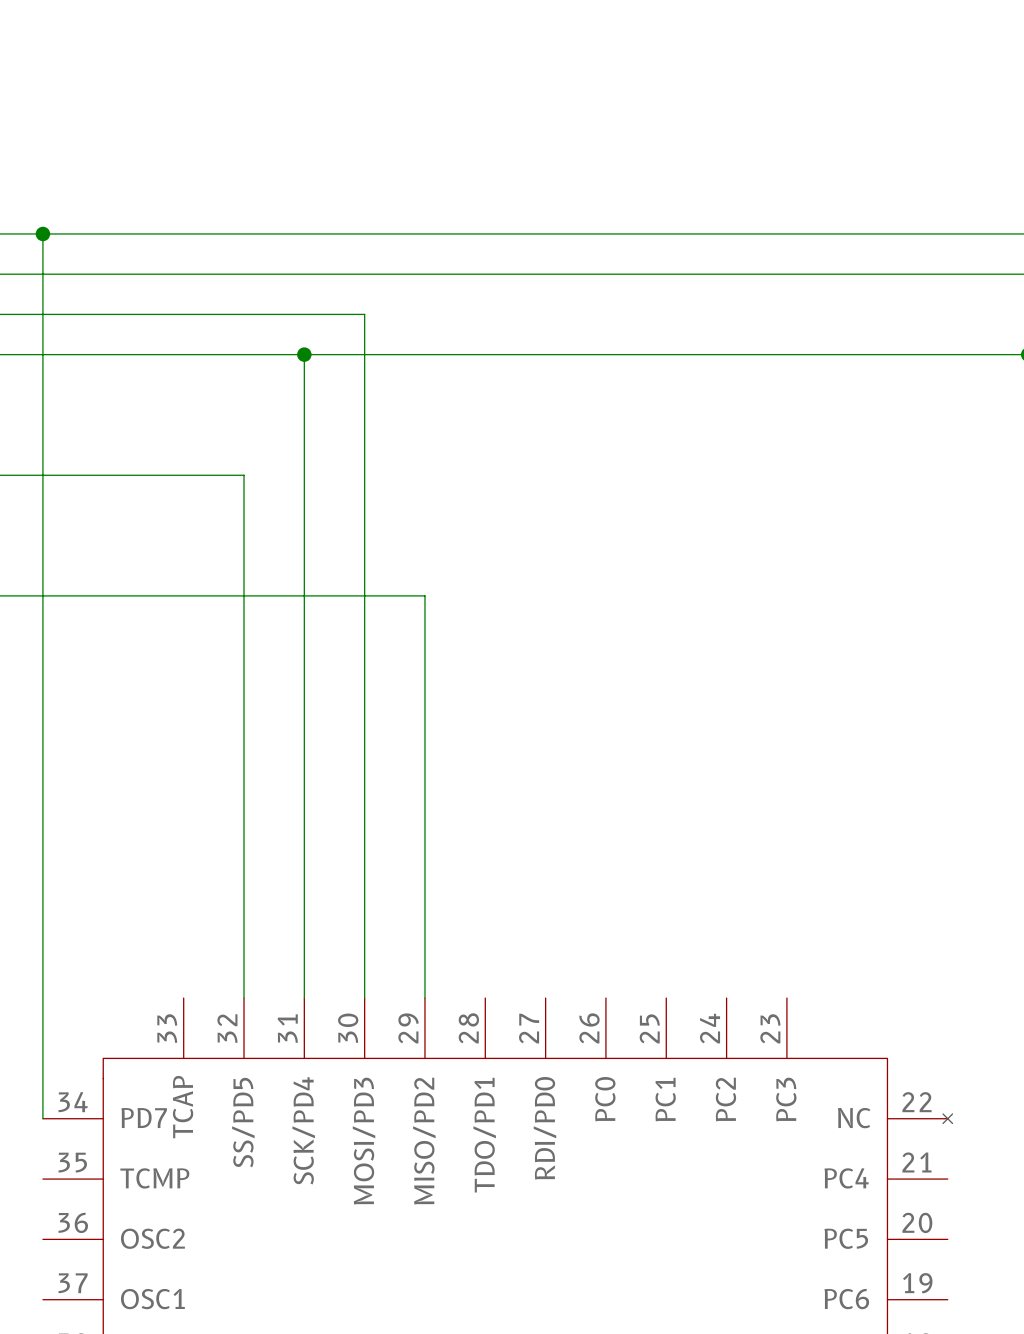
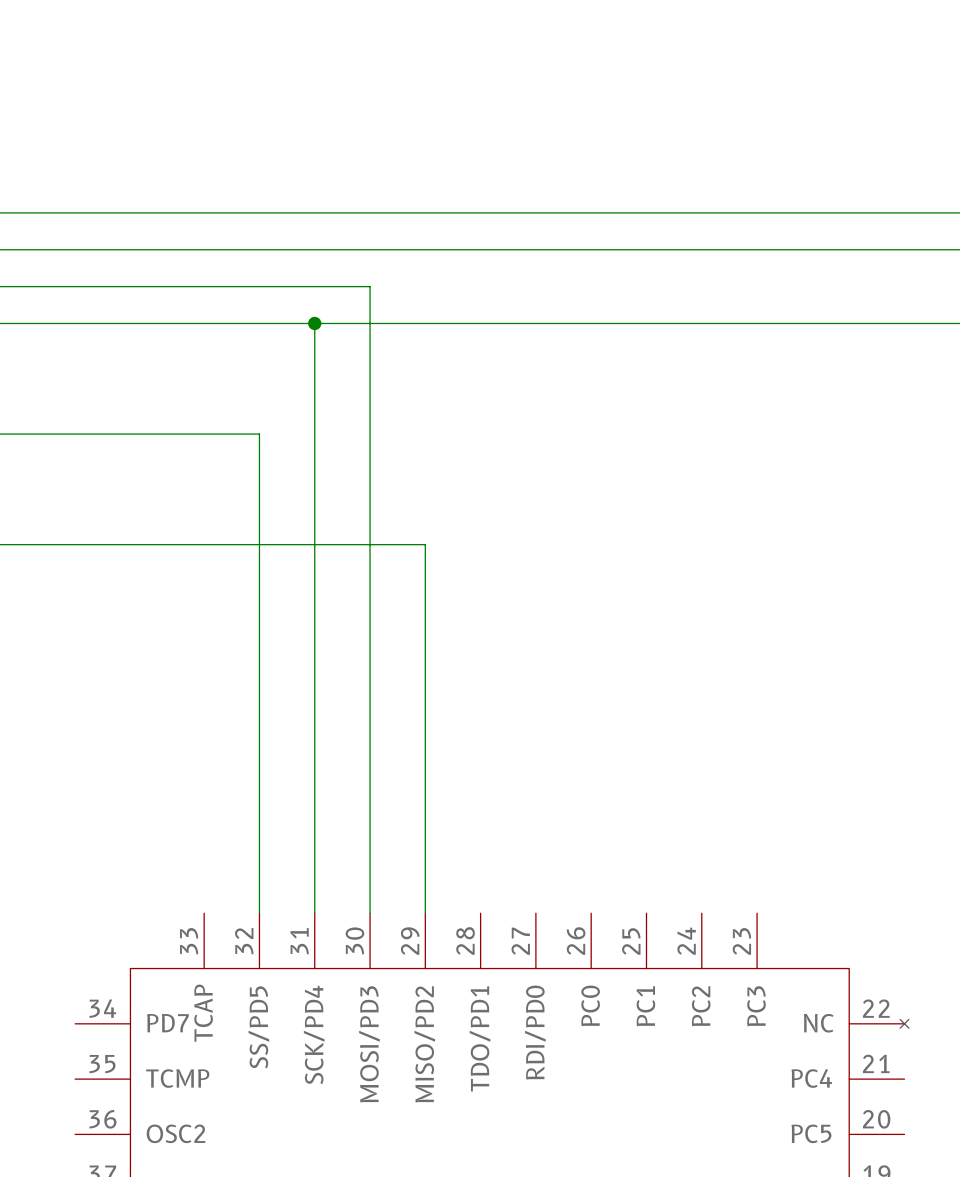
wire: (42, 233) (42, 1118) -> none
junction: (42, 233) -> none

